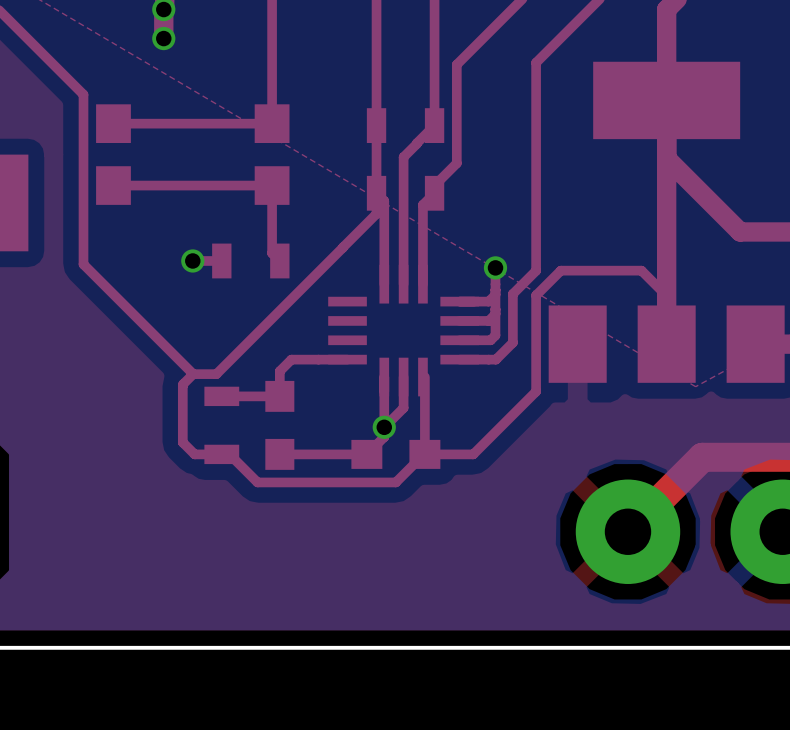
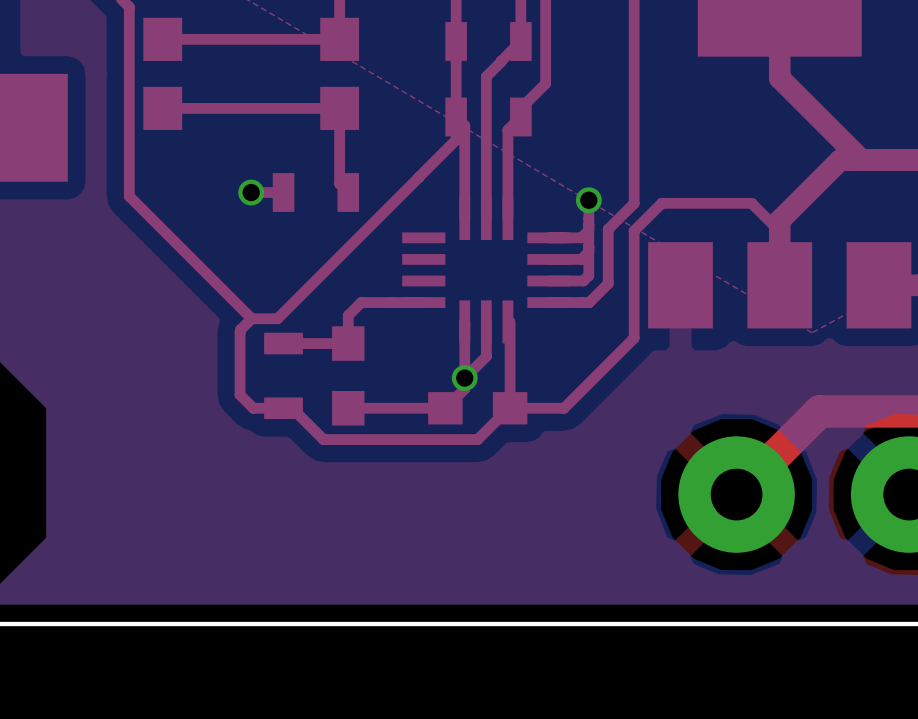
top track: (666, 158) (666, 286) -> (861, 160) (840, 160) (779, 220)

